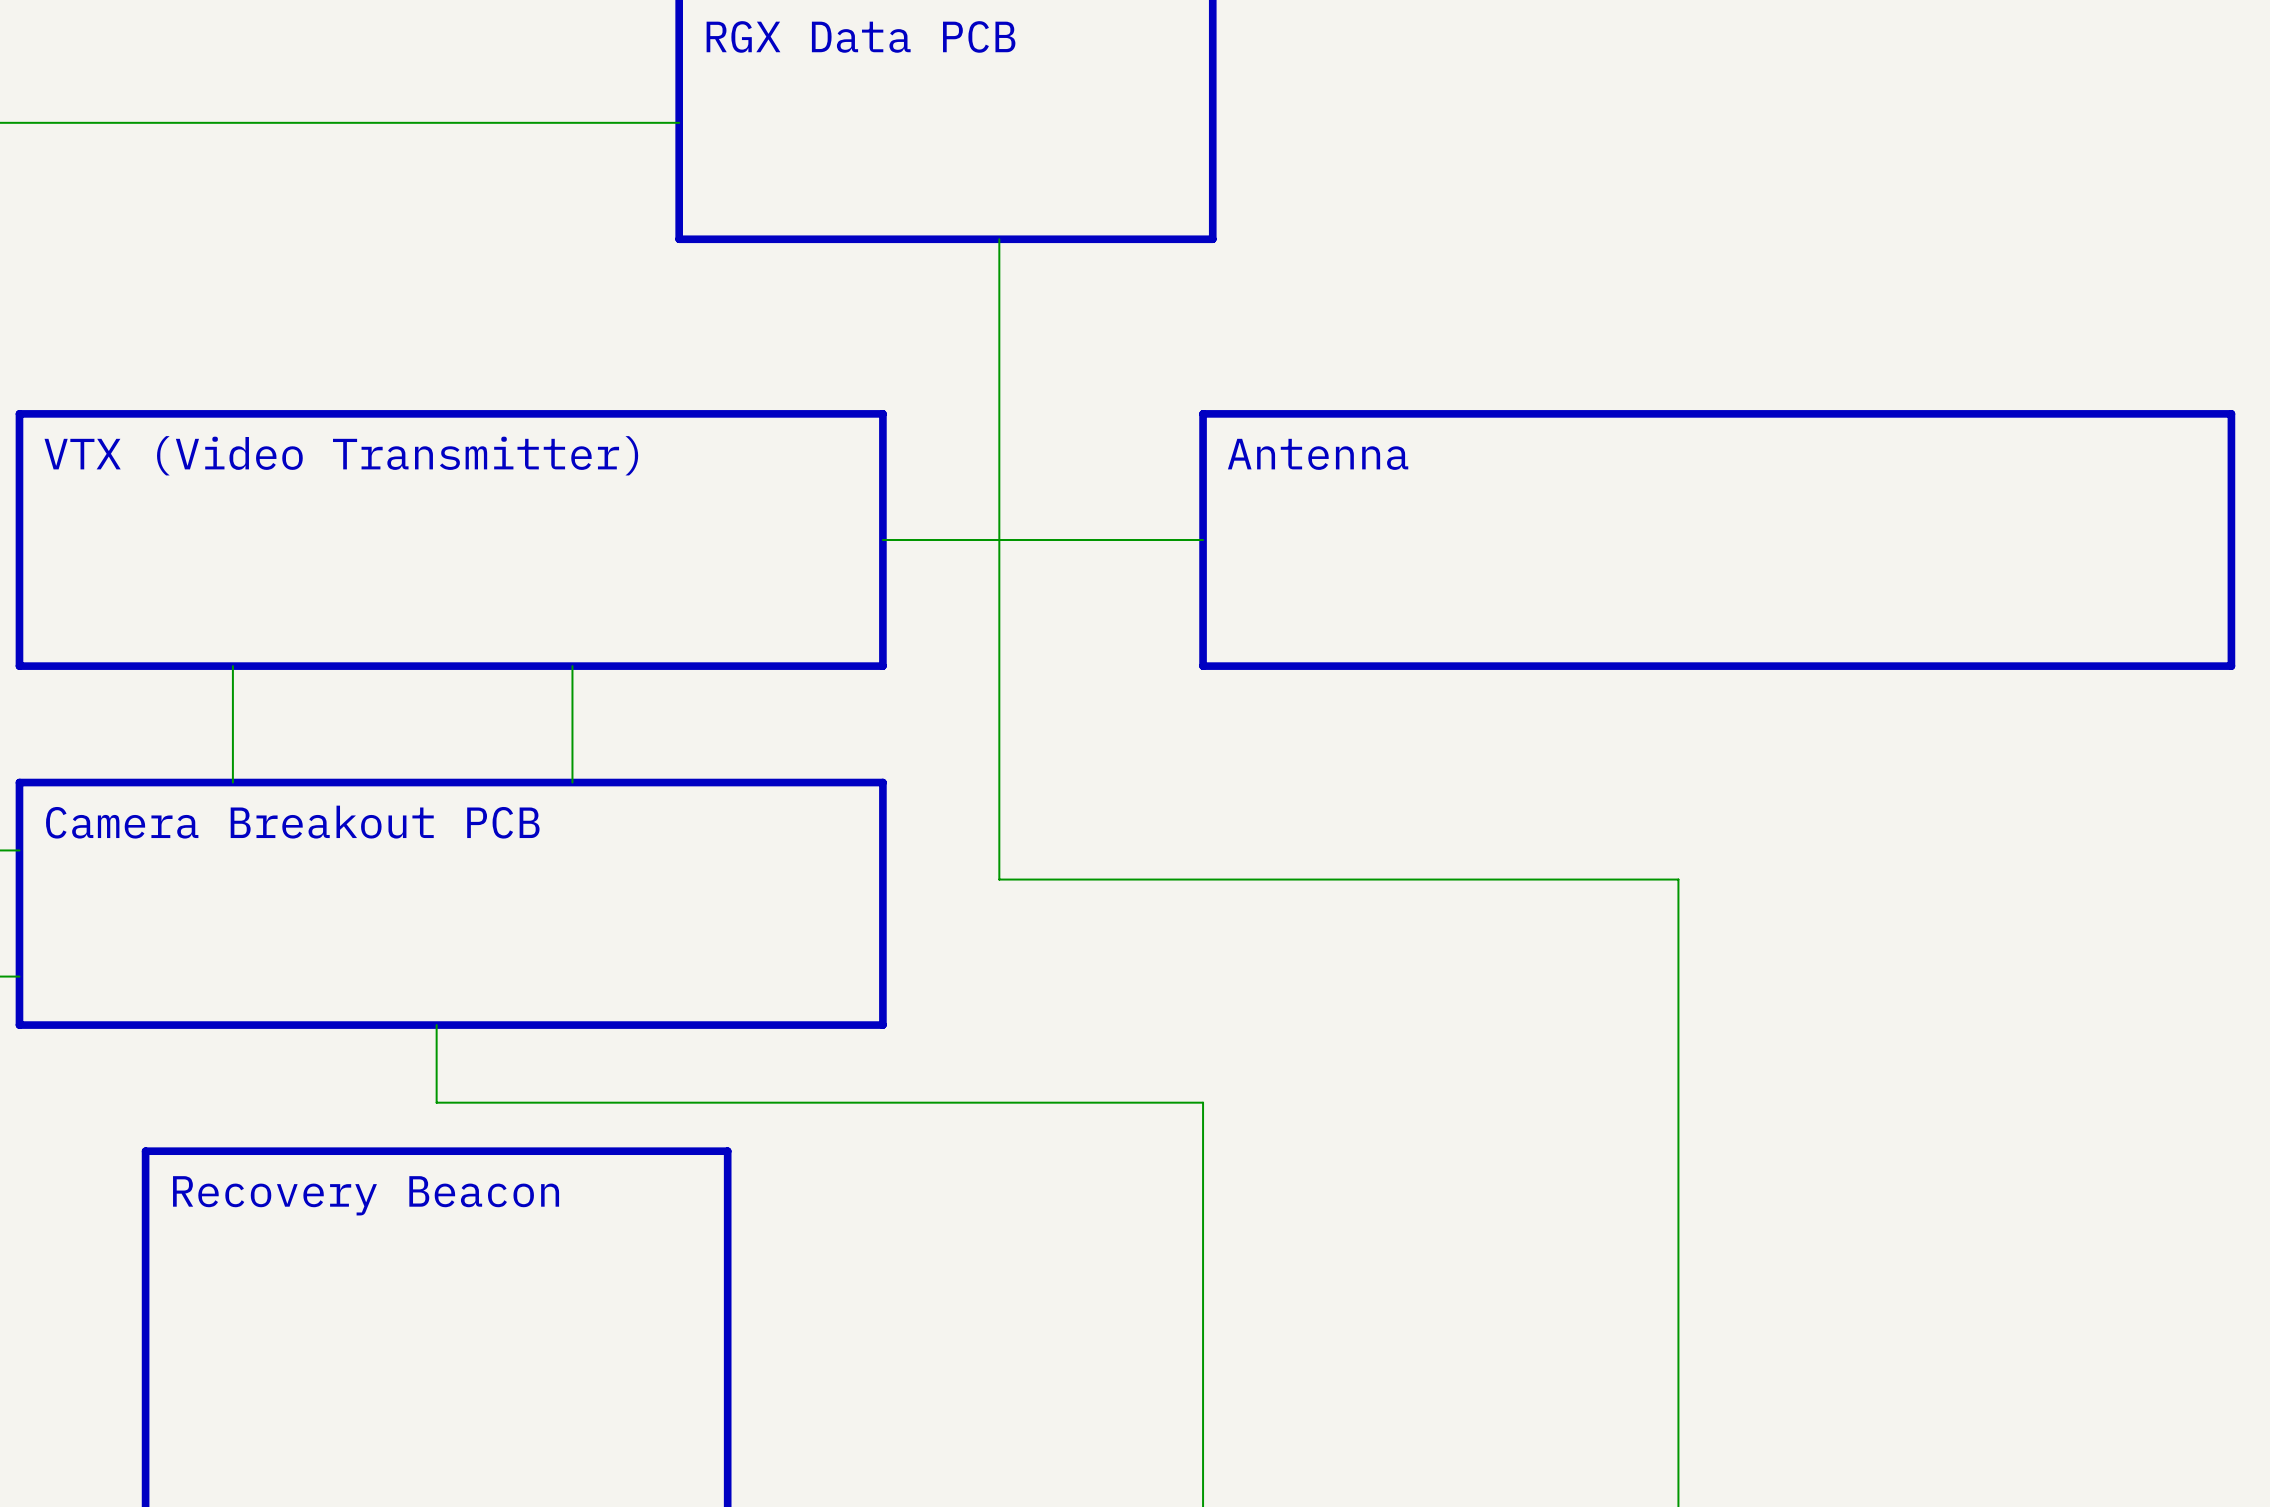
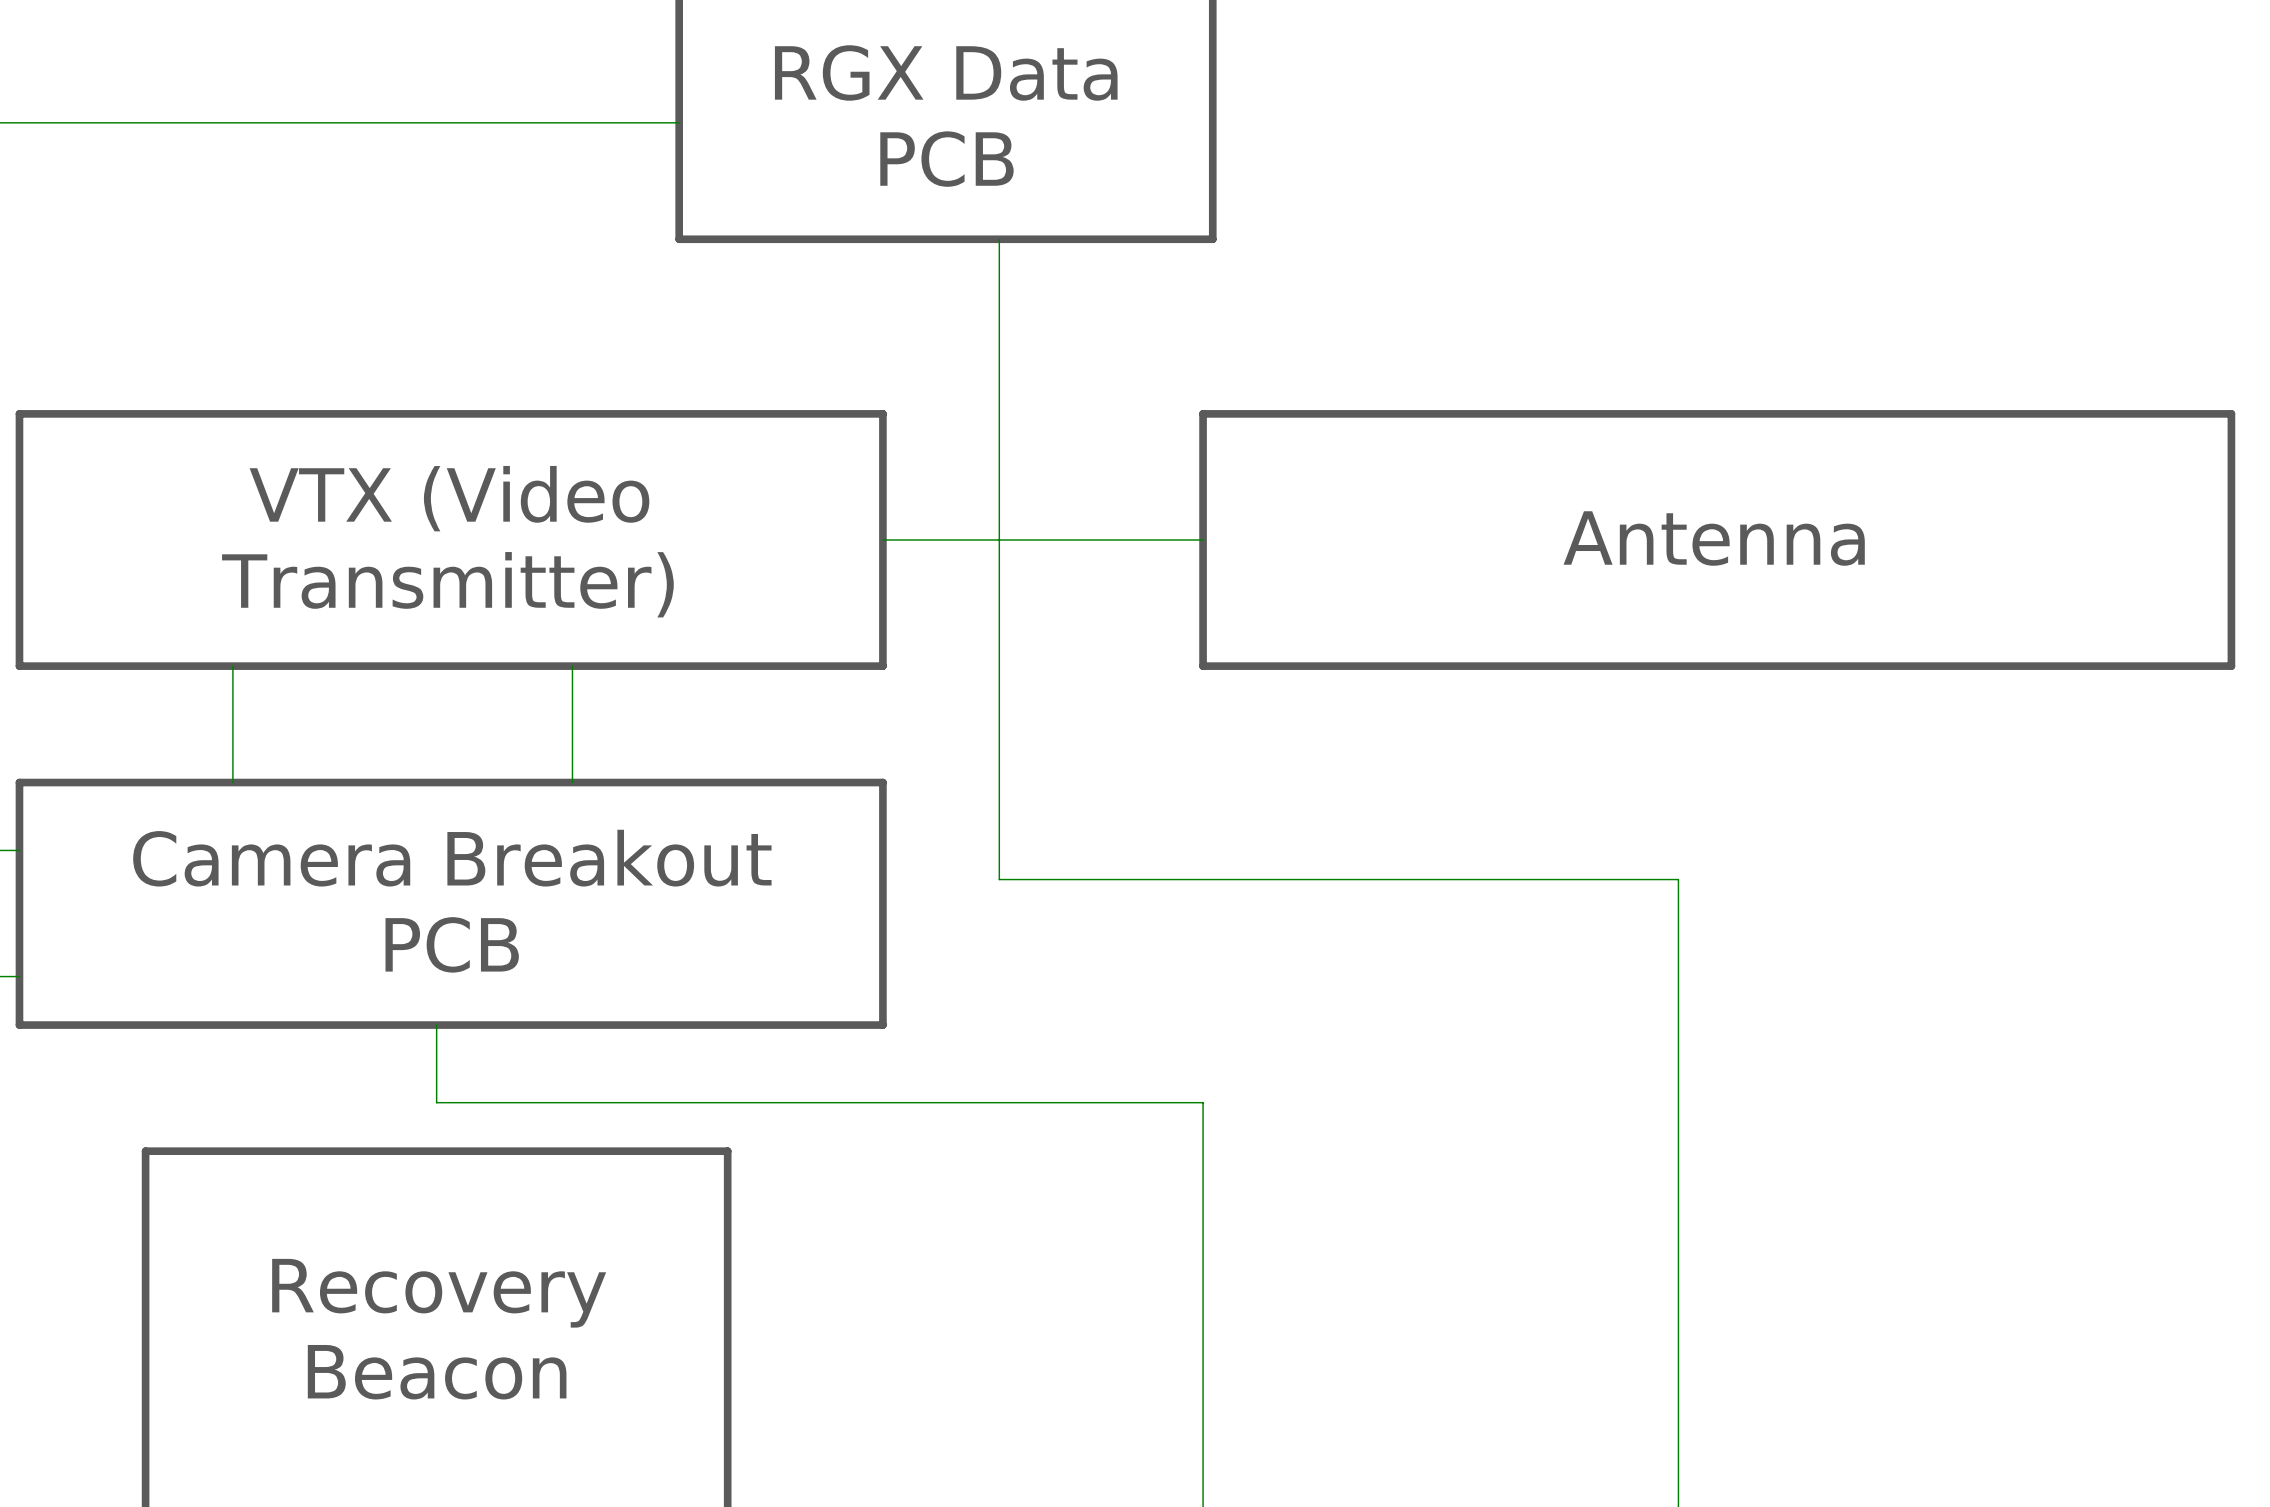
text: RGX Data PCB (861, 36) -> none
text: none -> RGX Data (946, 72)
text: none -> PCB (946, 159)
text: Antenna (1318, 454) -> none
text: VTX (Video Transmitter) (341, 455) -> none
text: none -> VTX (Video (449, 498)
text: none -> Antenna (1714, 538)
text: none -> Transmitter) (447, 584)
text: Camera Breakout PCB (292, 822) -> none
text: none -> Camera Breakout (452, 858)
text: none -> PCB (452, 944)
text: Recovery Beacon (366, 1195) -> none
text: none -> Recovery (439, 1293)
text: none -> Beacon (437, 1372)

